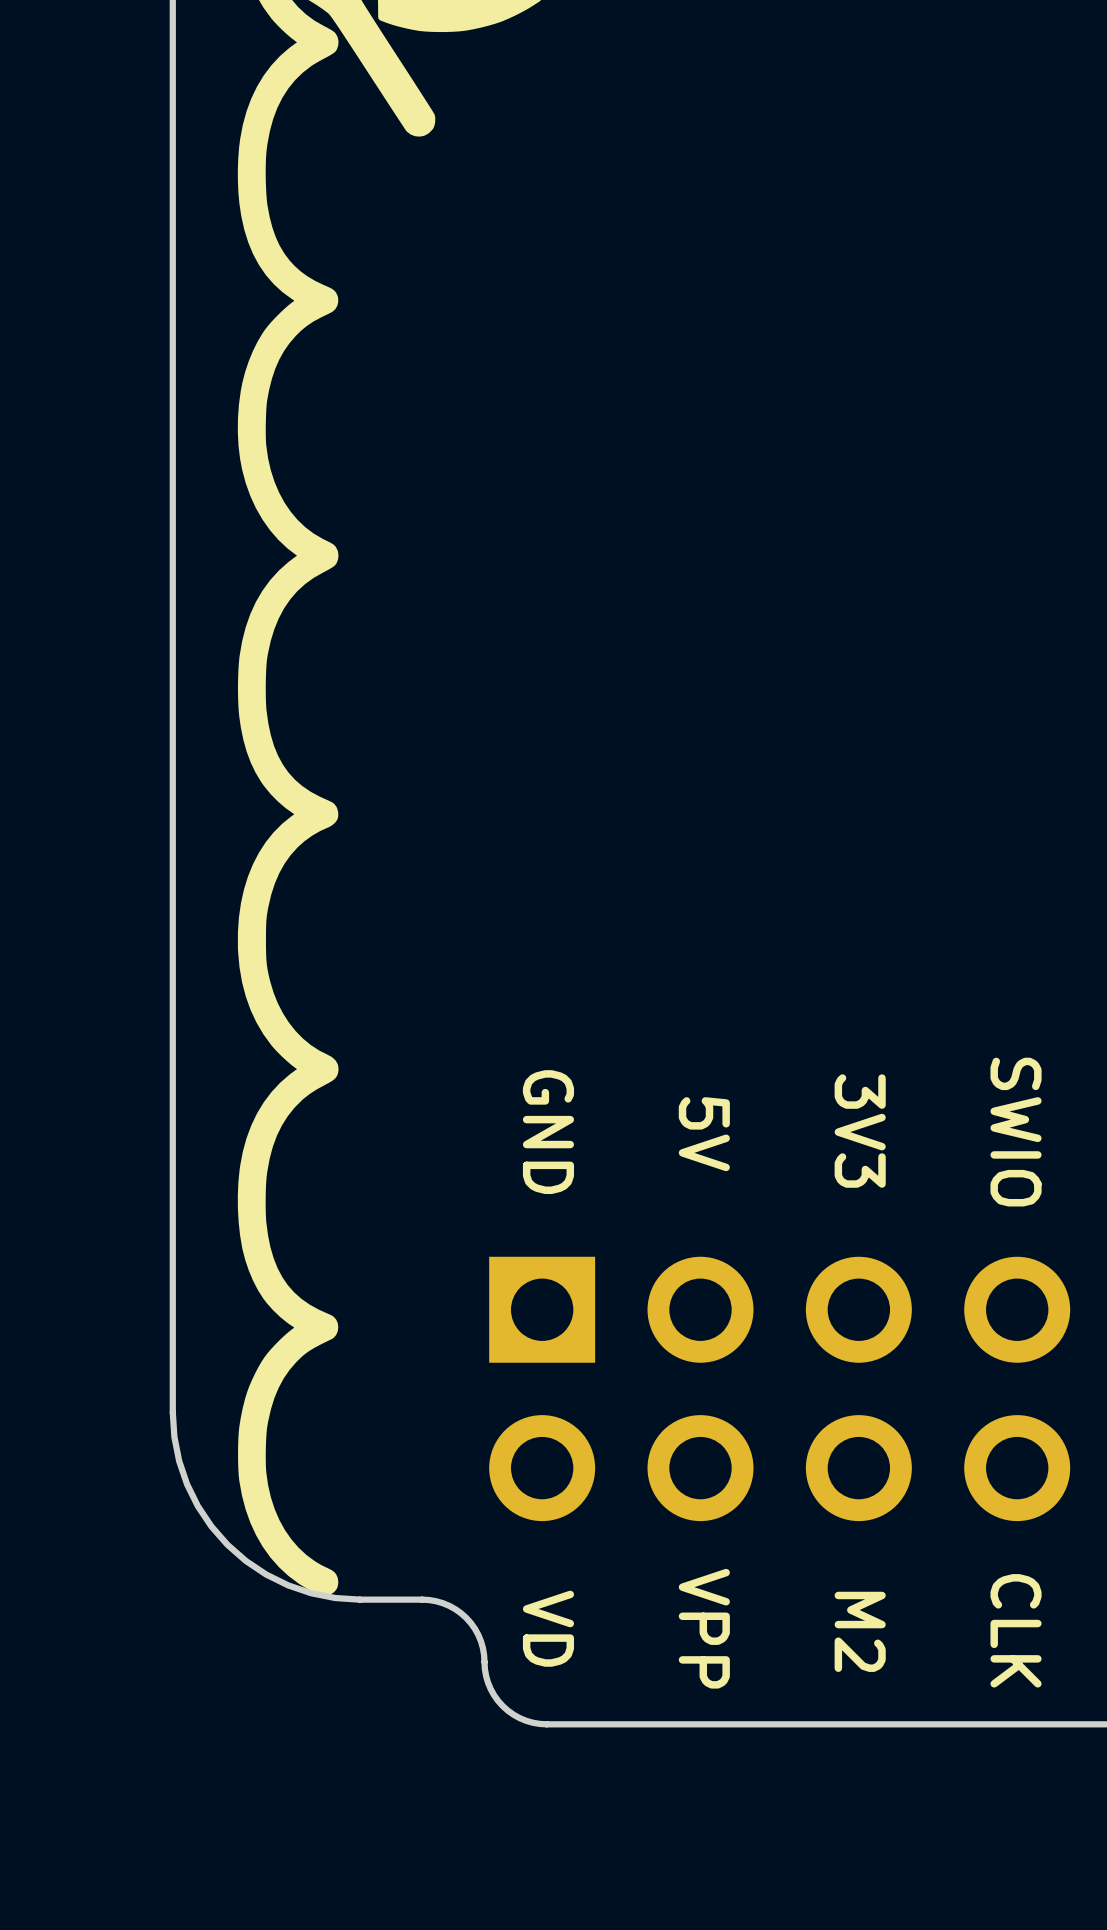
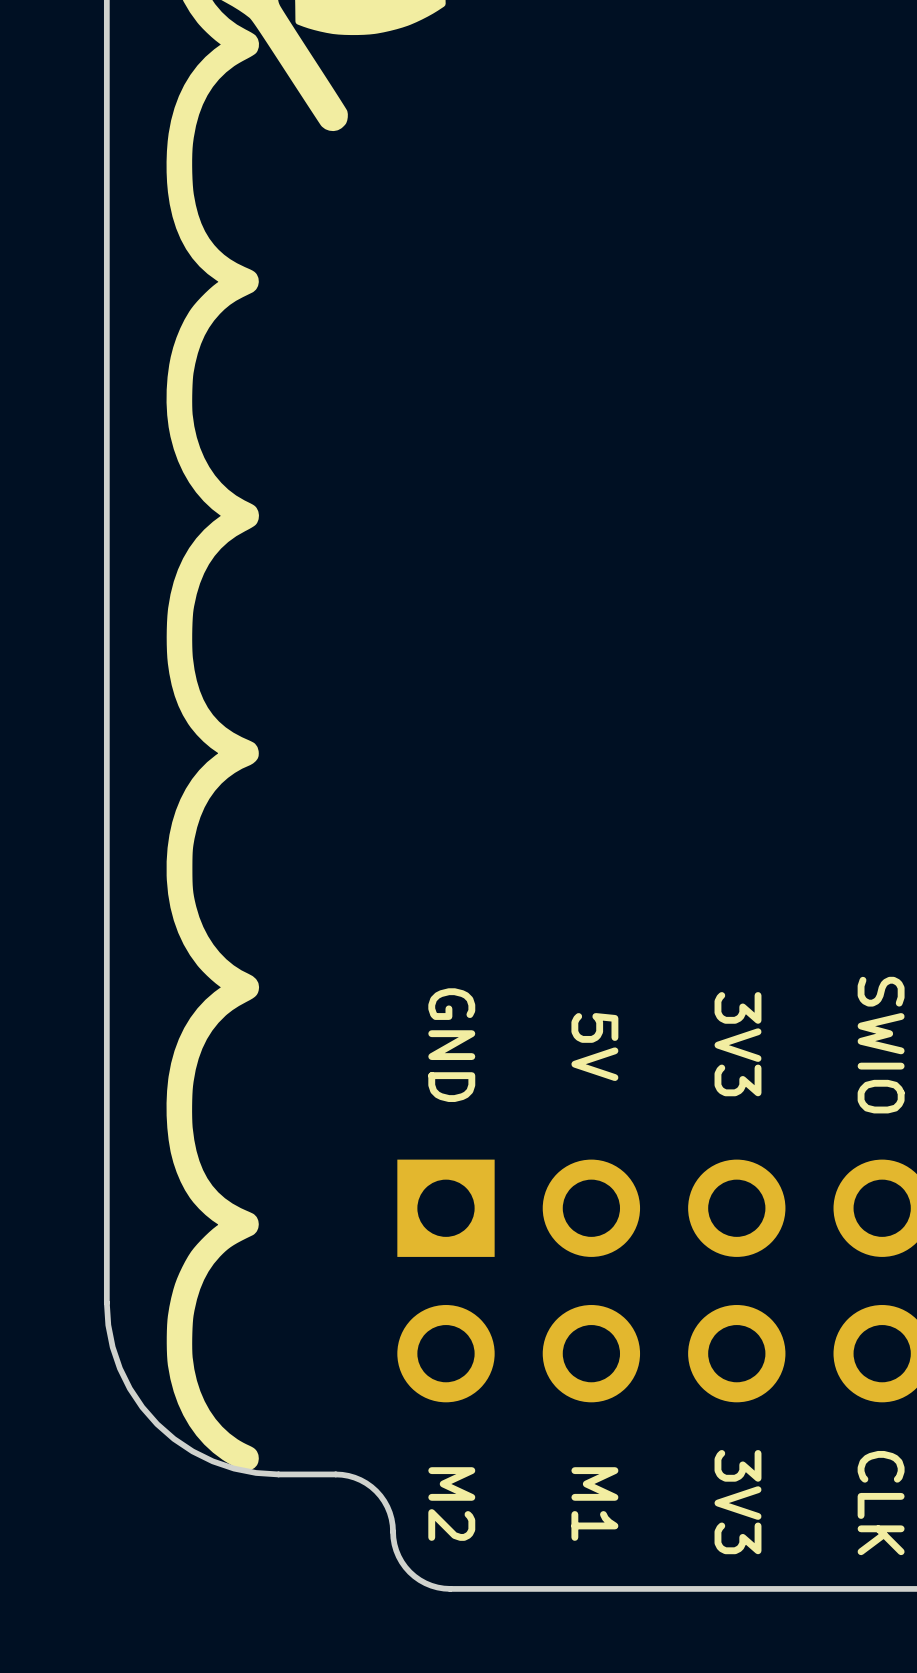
text: VD (548, 1628) -> M2 (451, 1504)
text: VPP (704, 1628) -> M1 (594, 1504)
text: M2 (860, 1631) -> 3V3 (737, 1502)

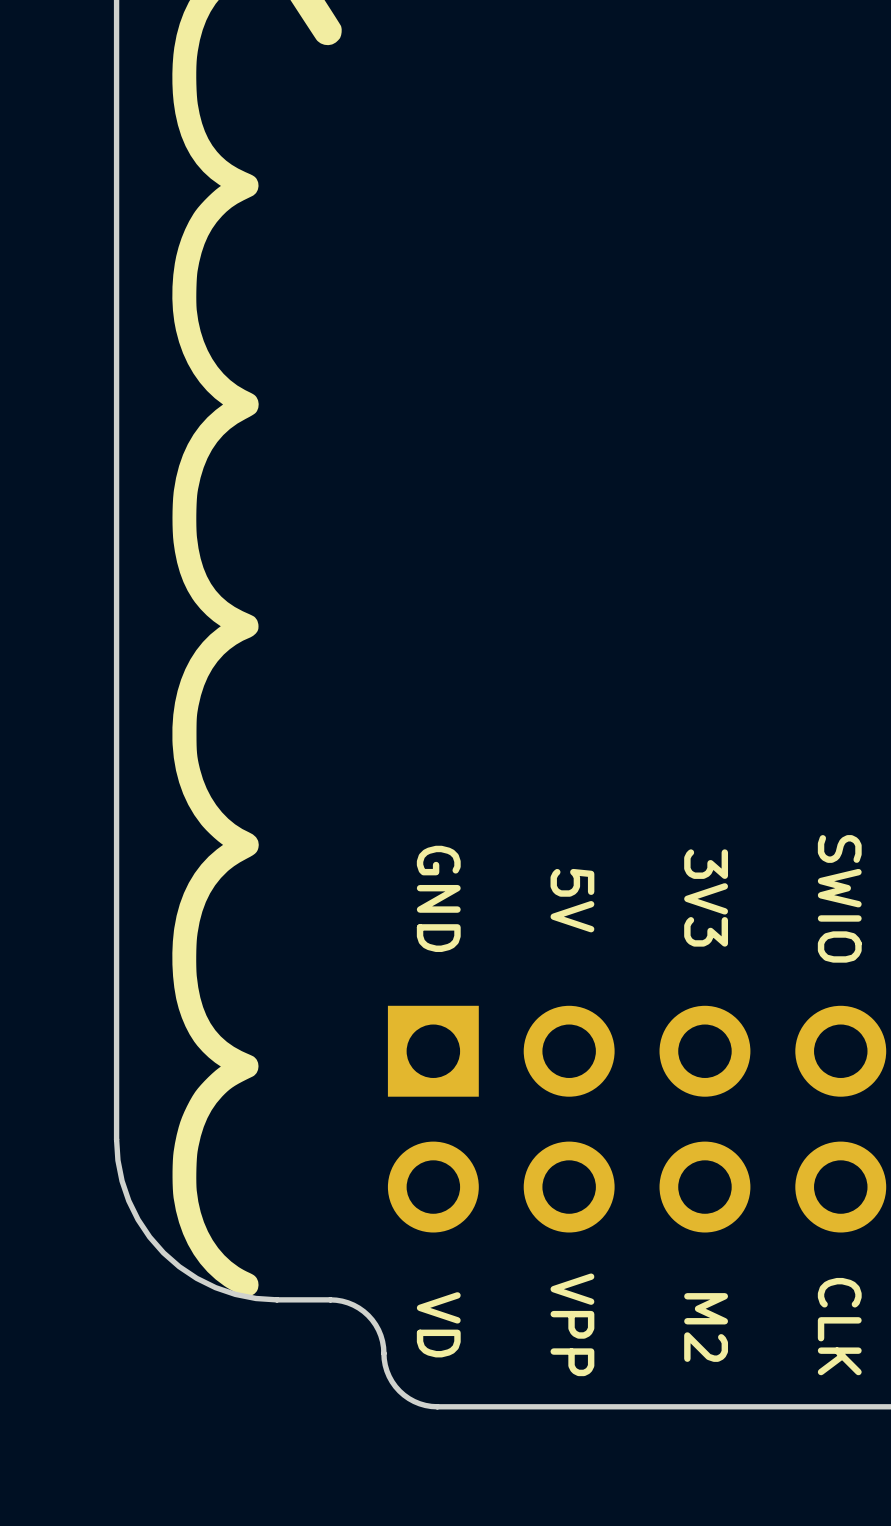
text: 3V3 (737, 1502) -> M2 (706, 1327)
text: M2 (451, 1504) -> VD (438, 1324)
text: M1 (594, 1504) -> VPP (572, 1324)

